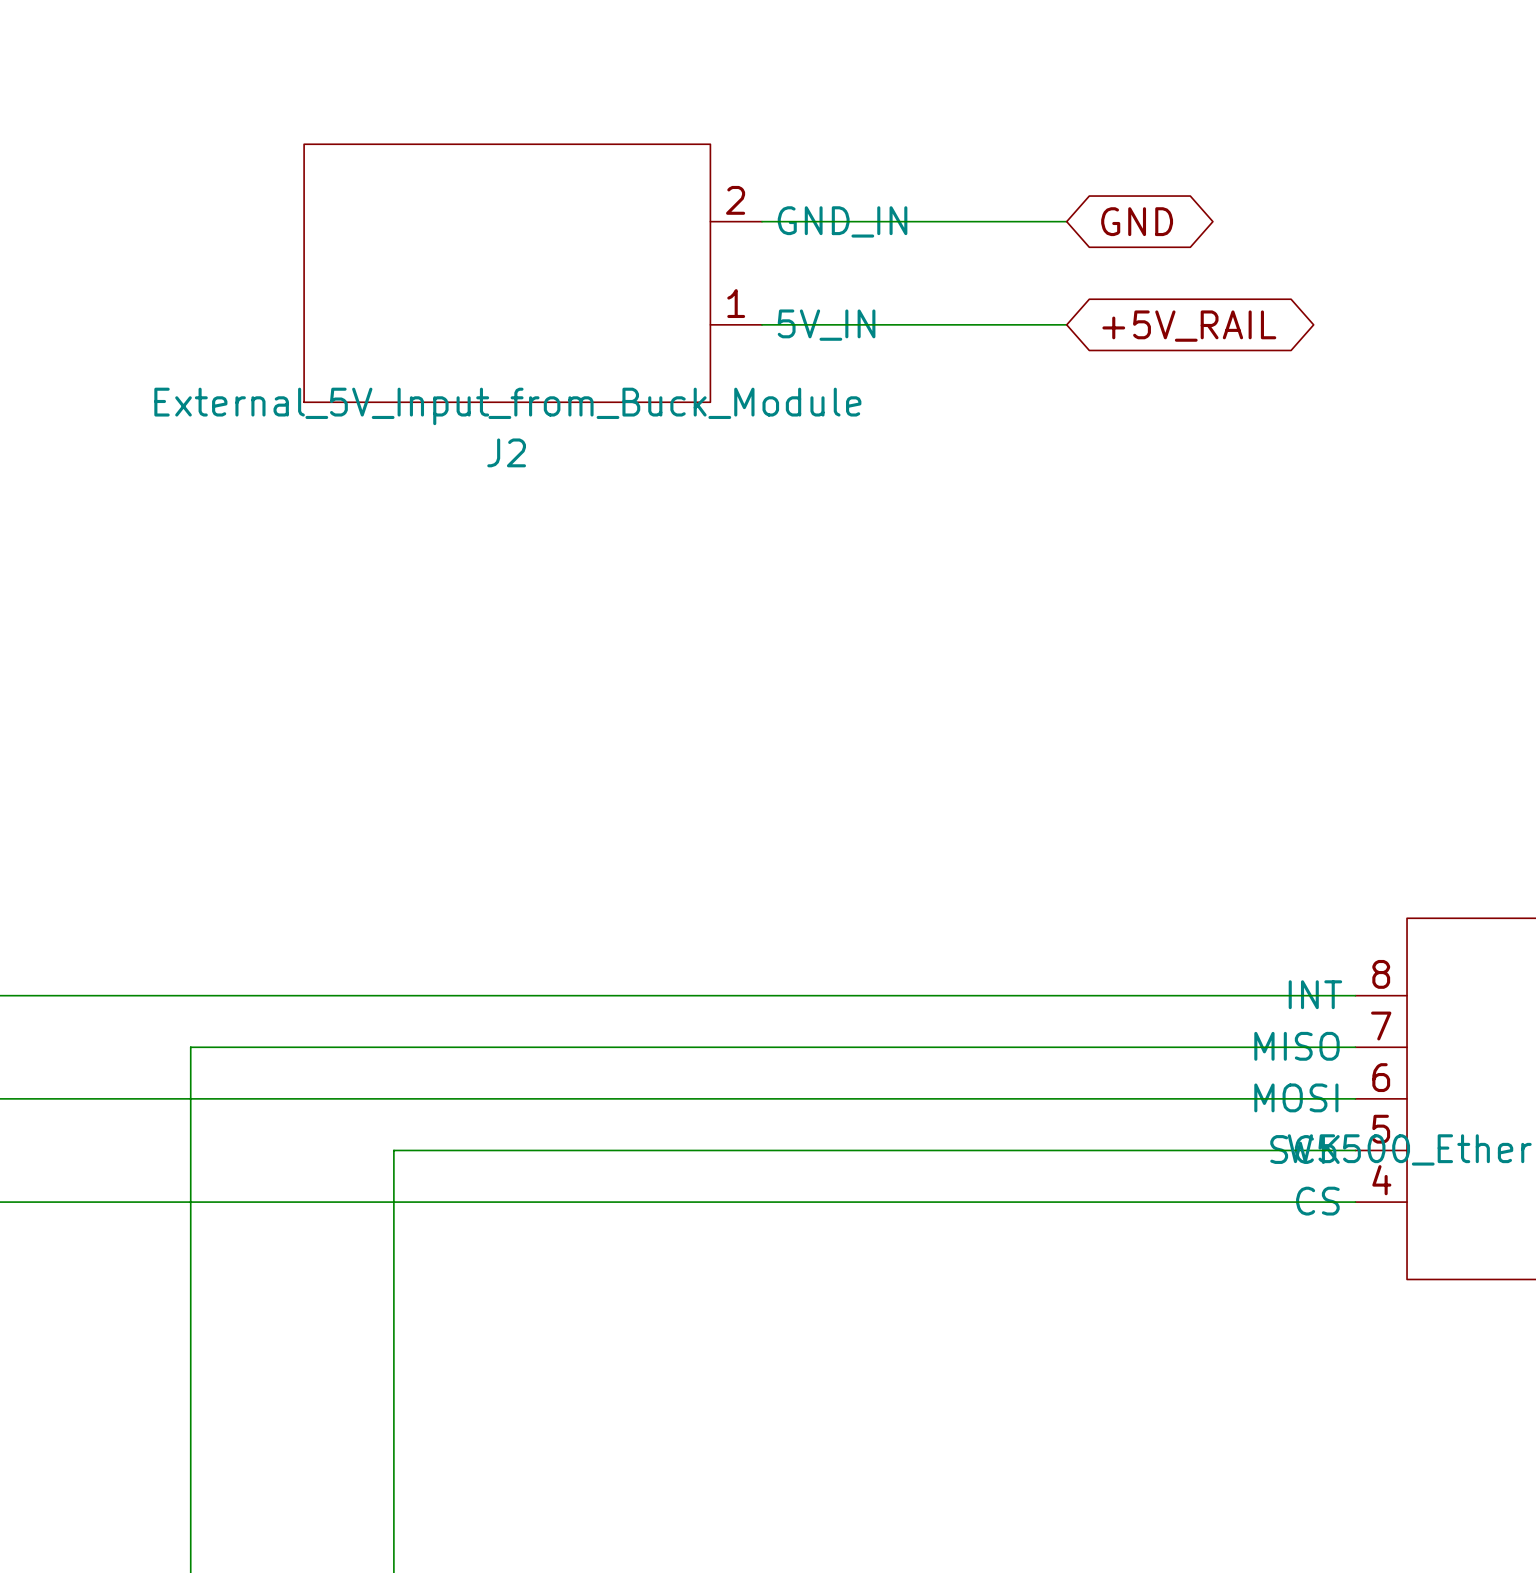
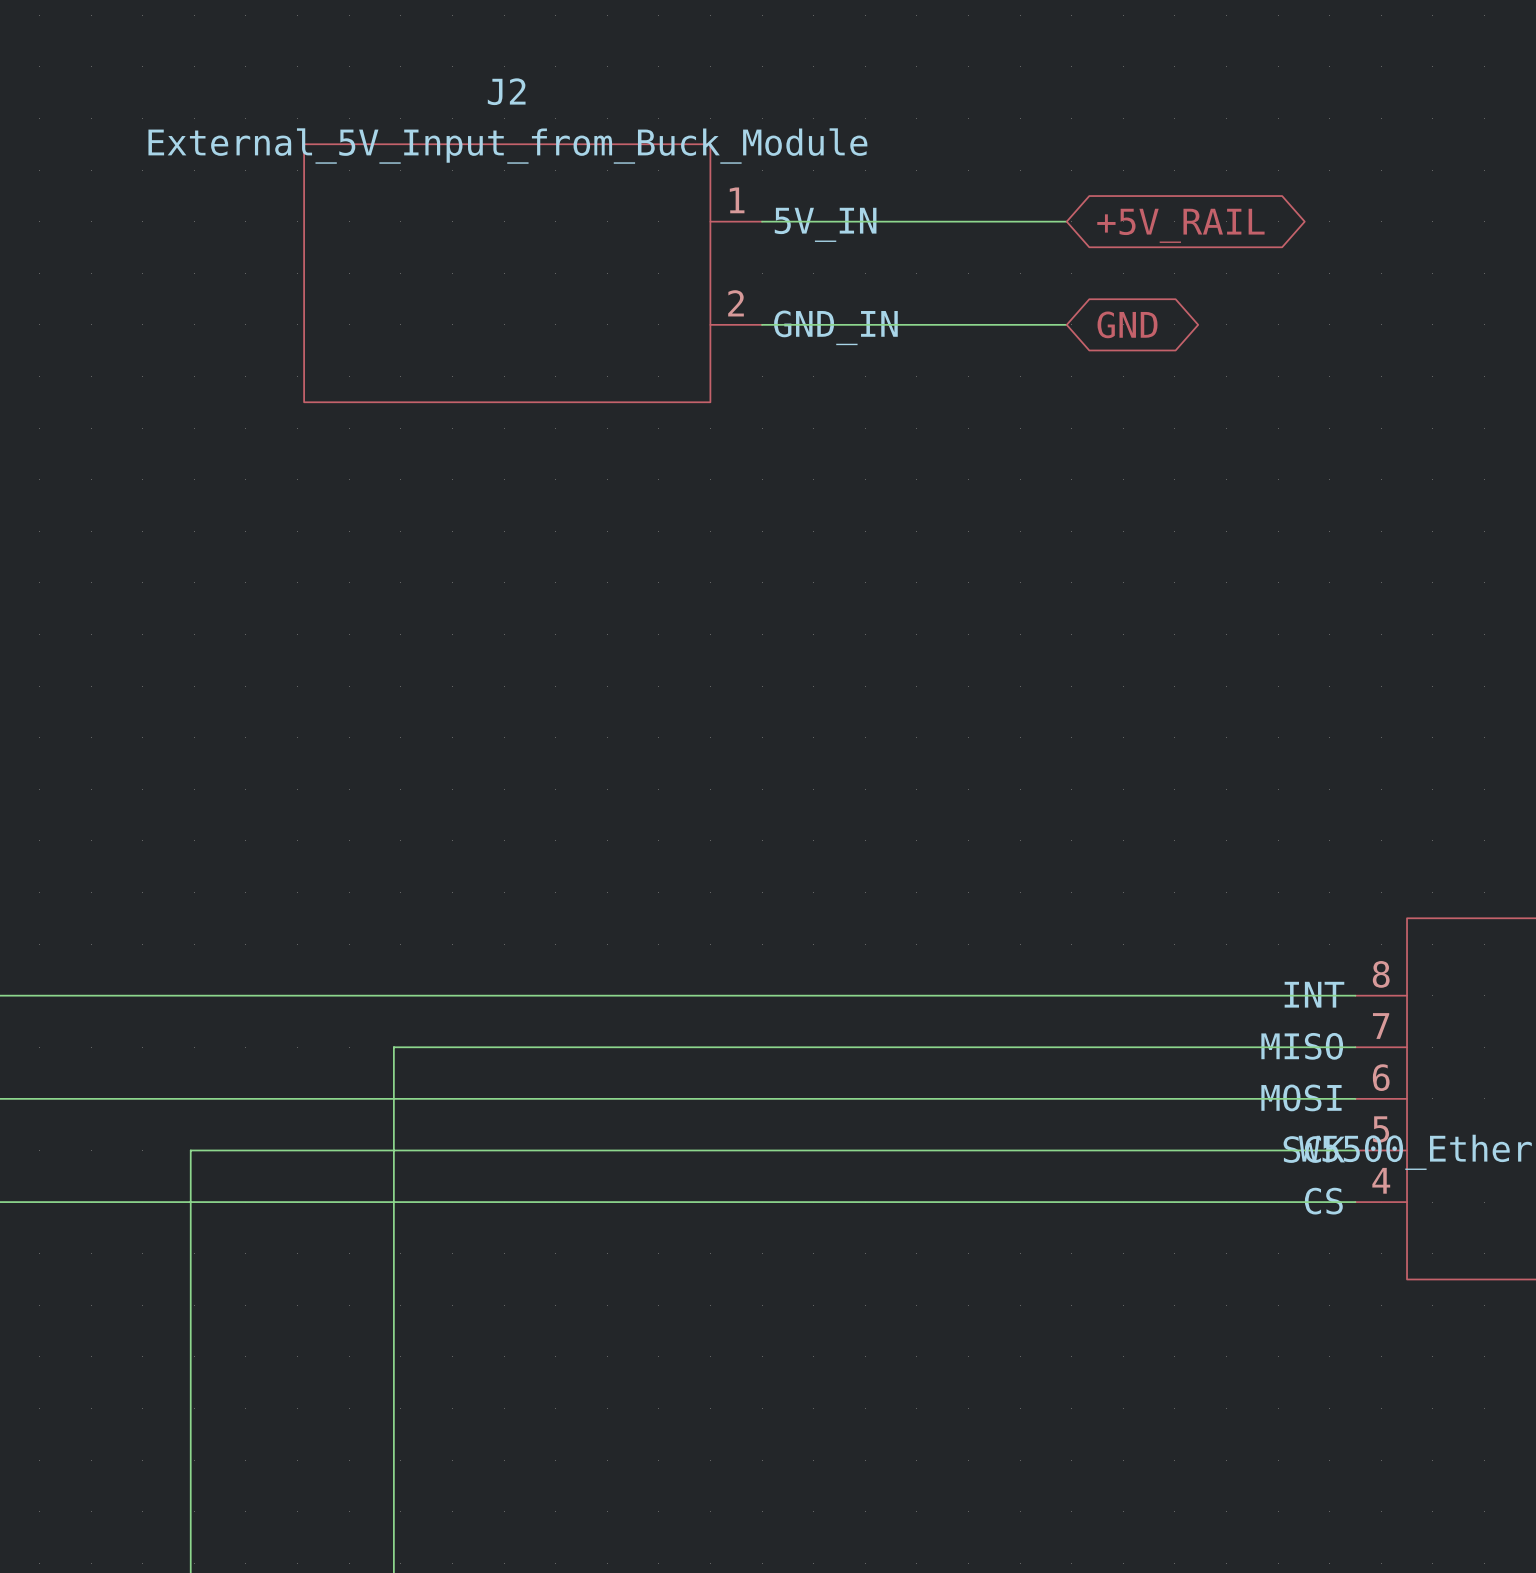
global label: GND (1137, 221) -> +5V_RAIL (1180, 225)
J2 flip: as is (507, 273) -> up-down (507, 273)
global label: +5V_RAIL (1189, 326) -> GND (1127, 324)
wire: (393, 1047) (190, 1047) (190, 1150) -> (393, 1047) (393, 1150) (190, 1150)

